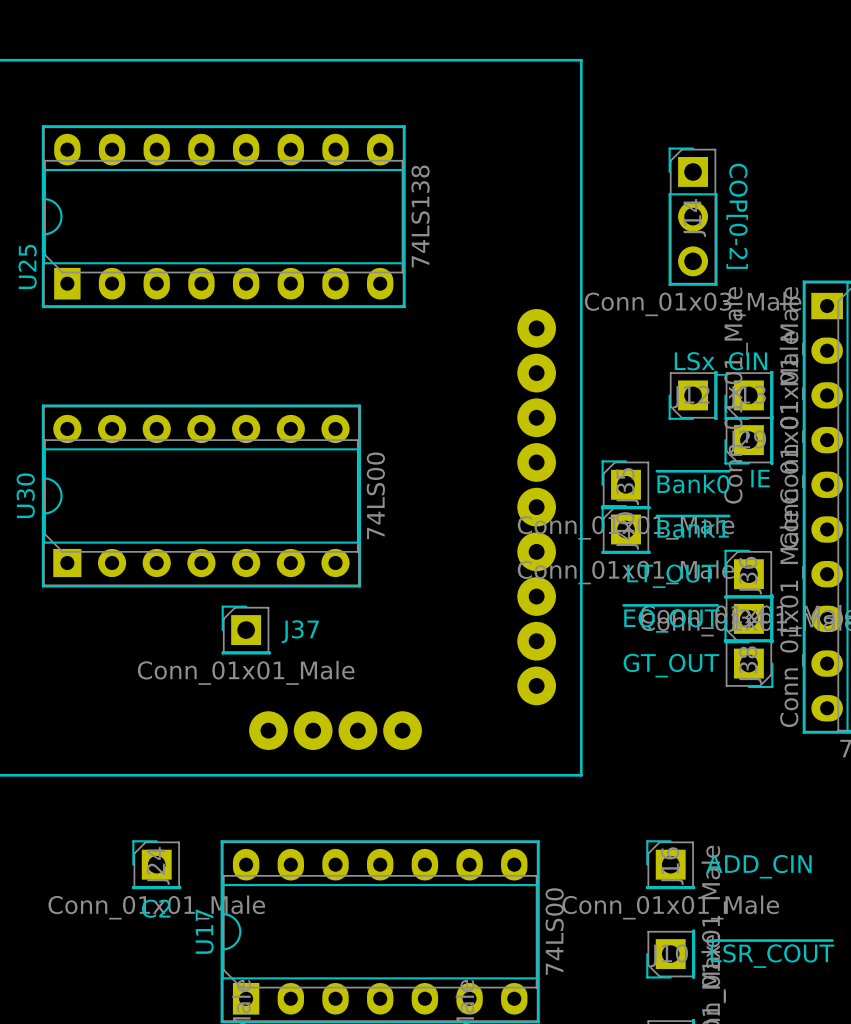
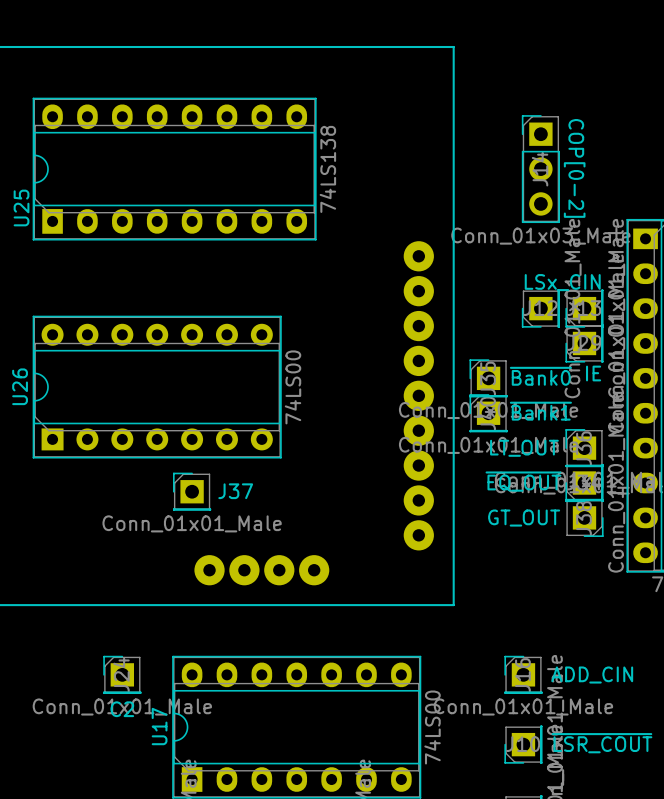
U30 name: U30 (25, 495) -> U26 (20, 386)

